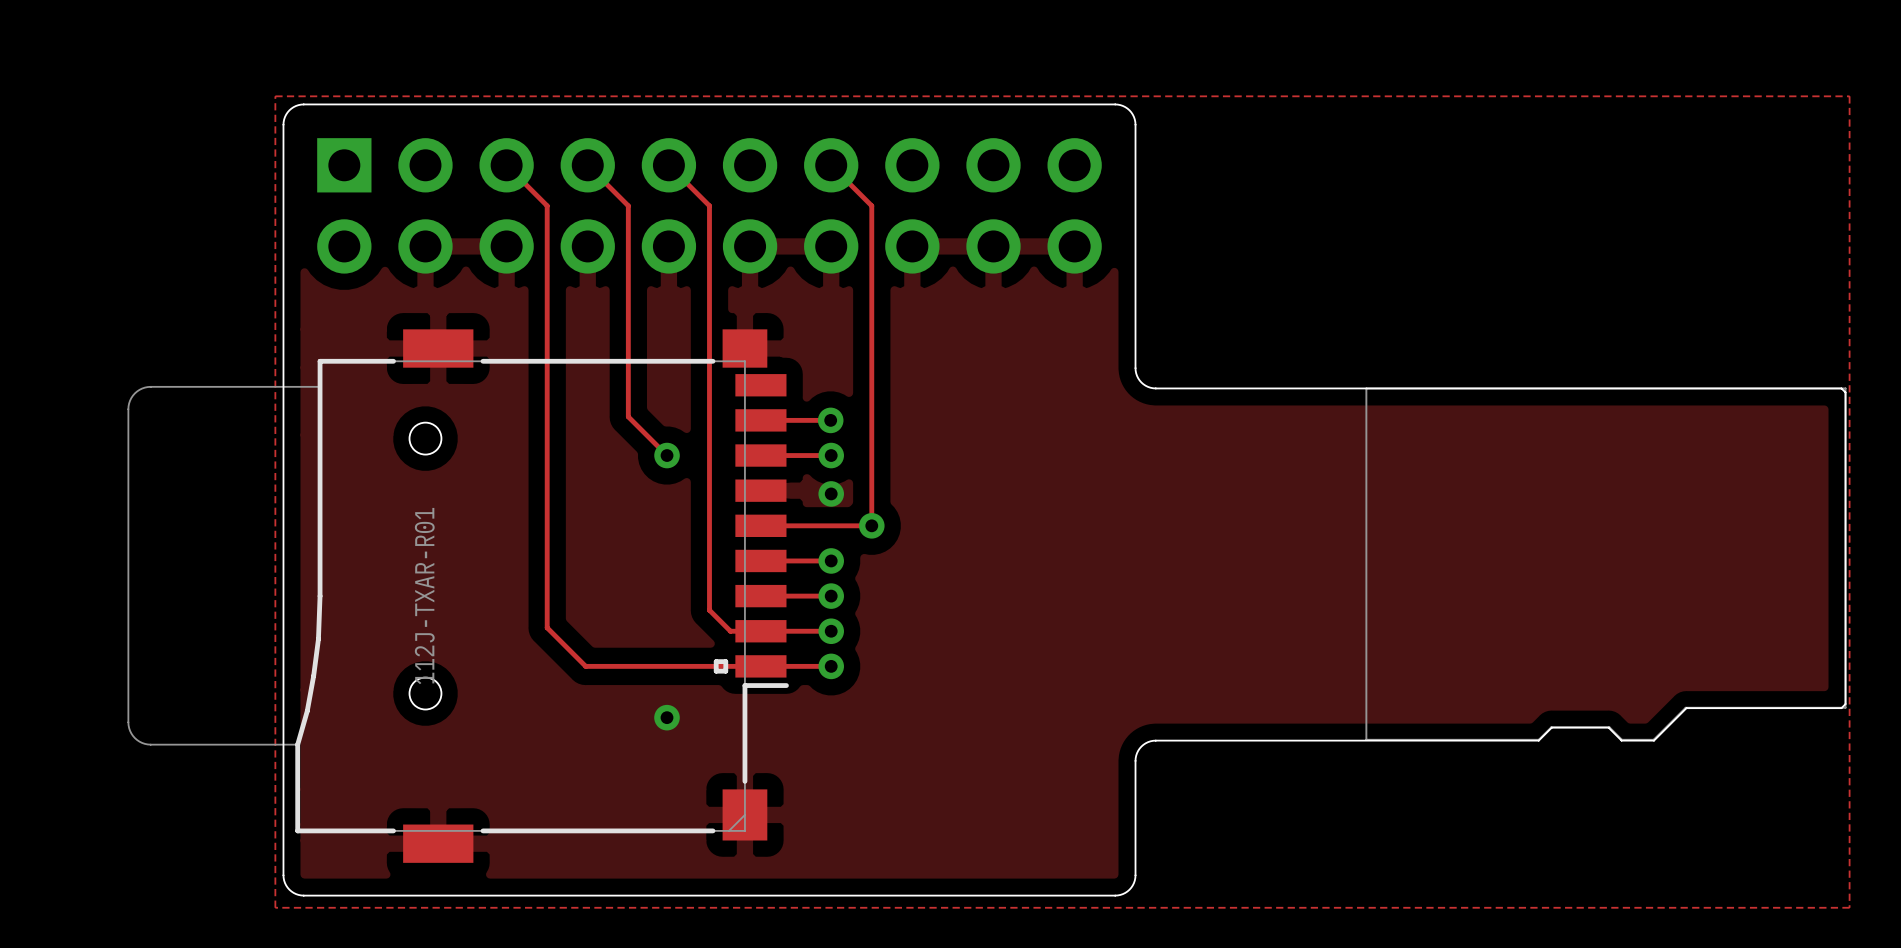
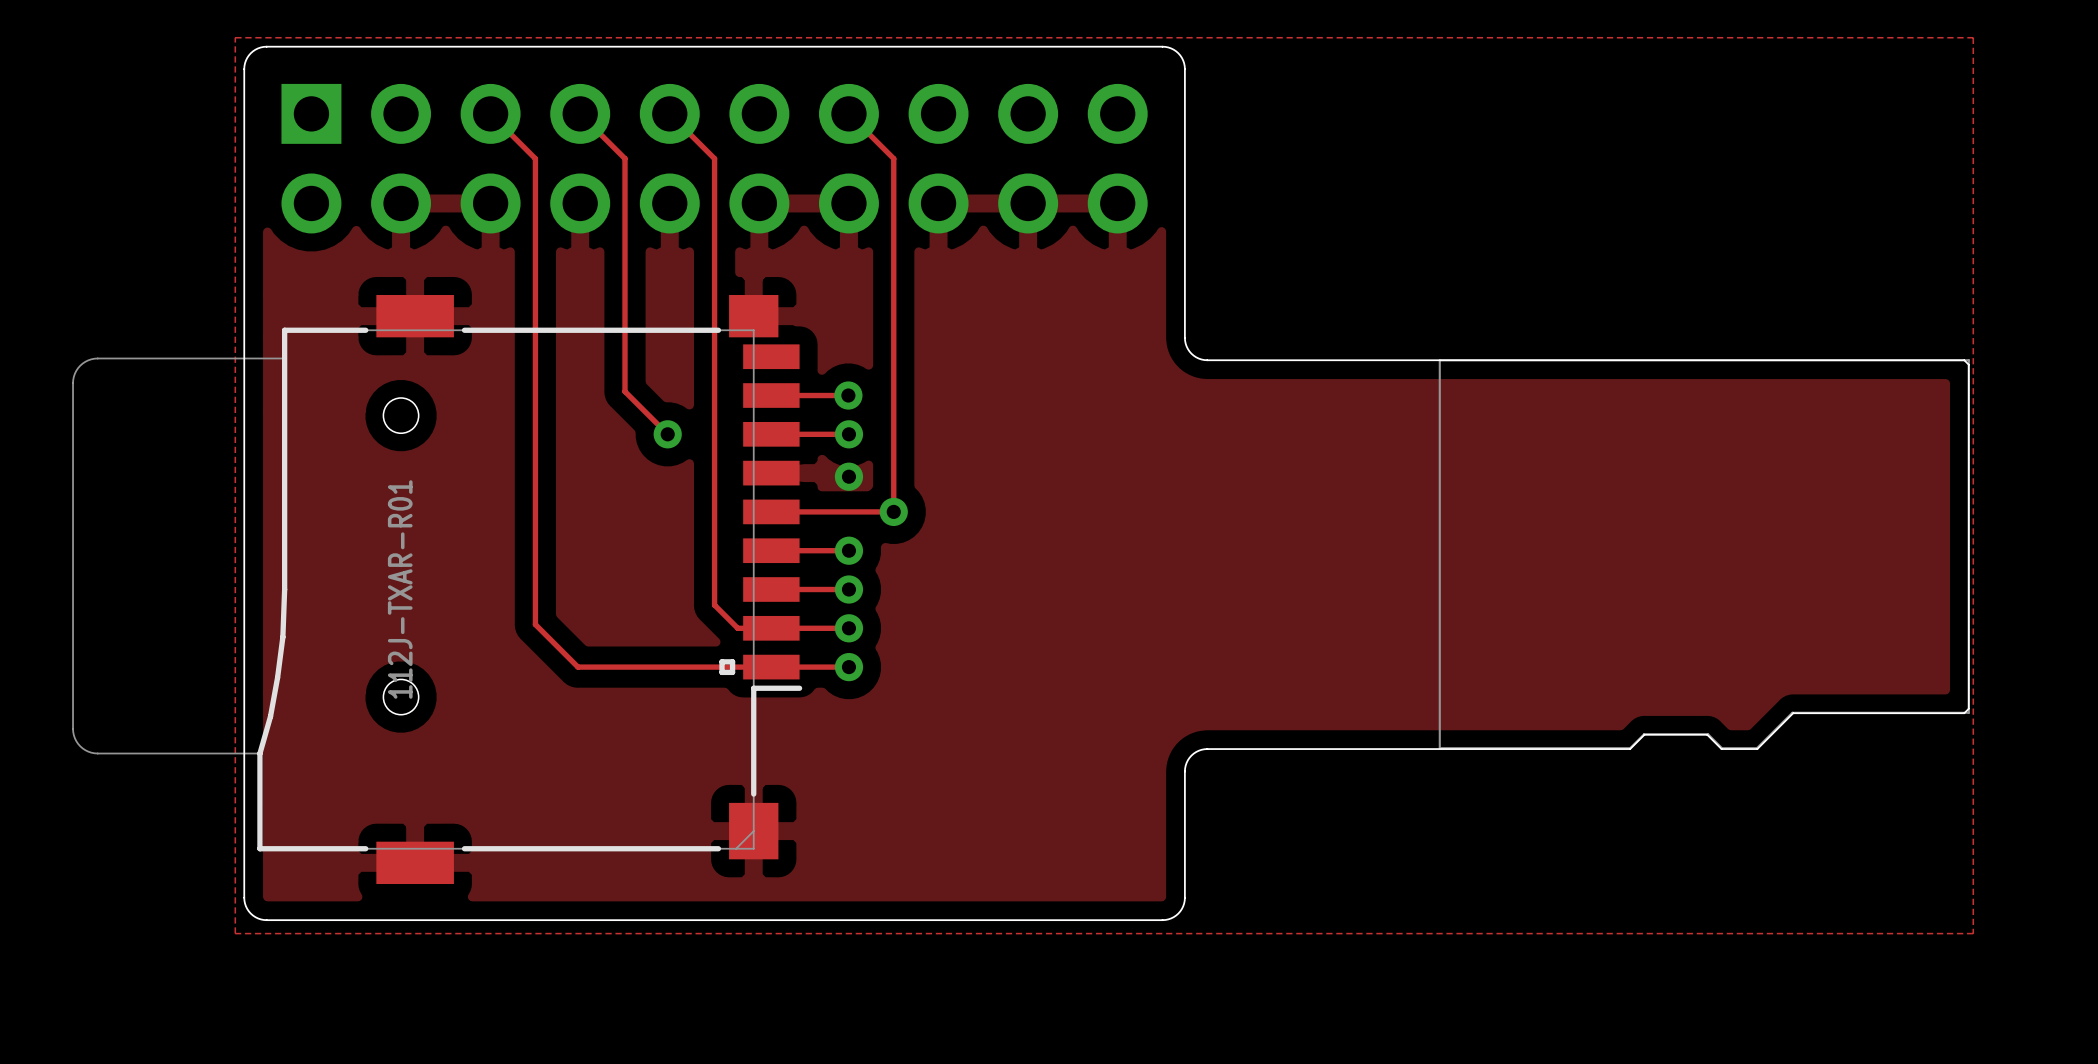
via: (667, 717) -> none

